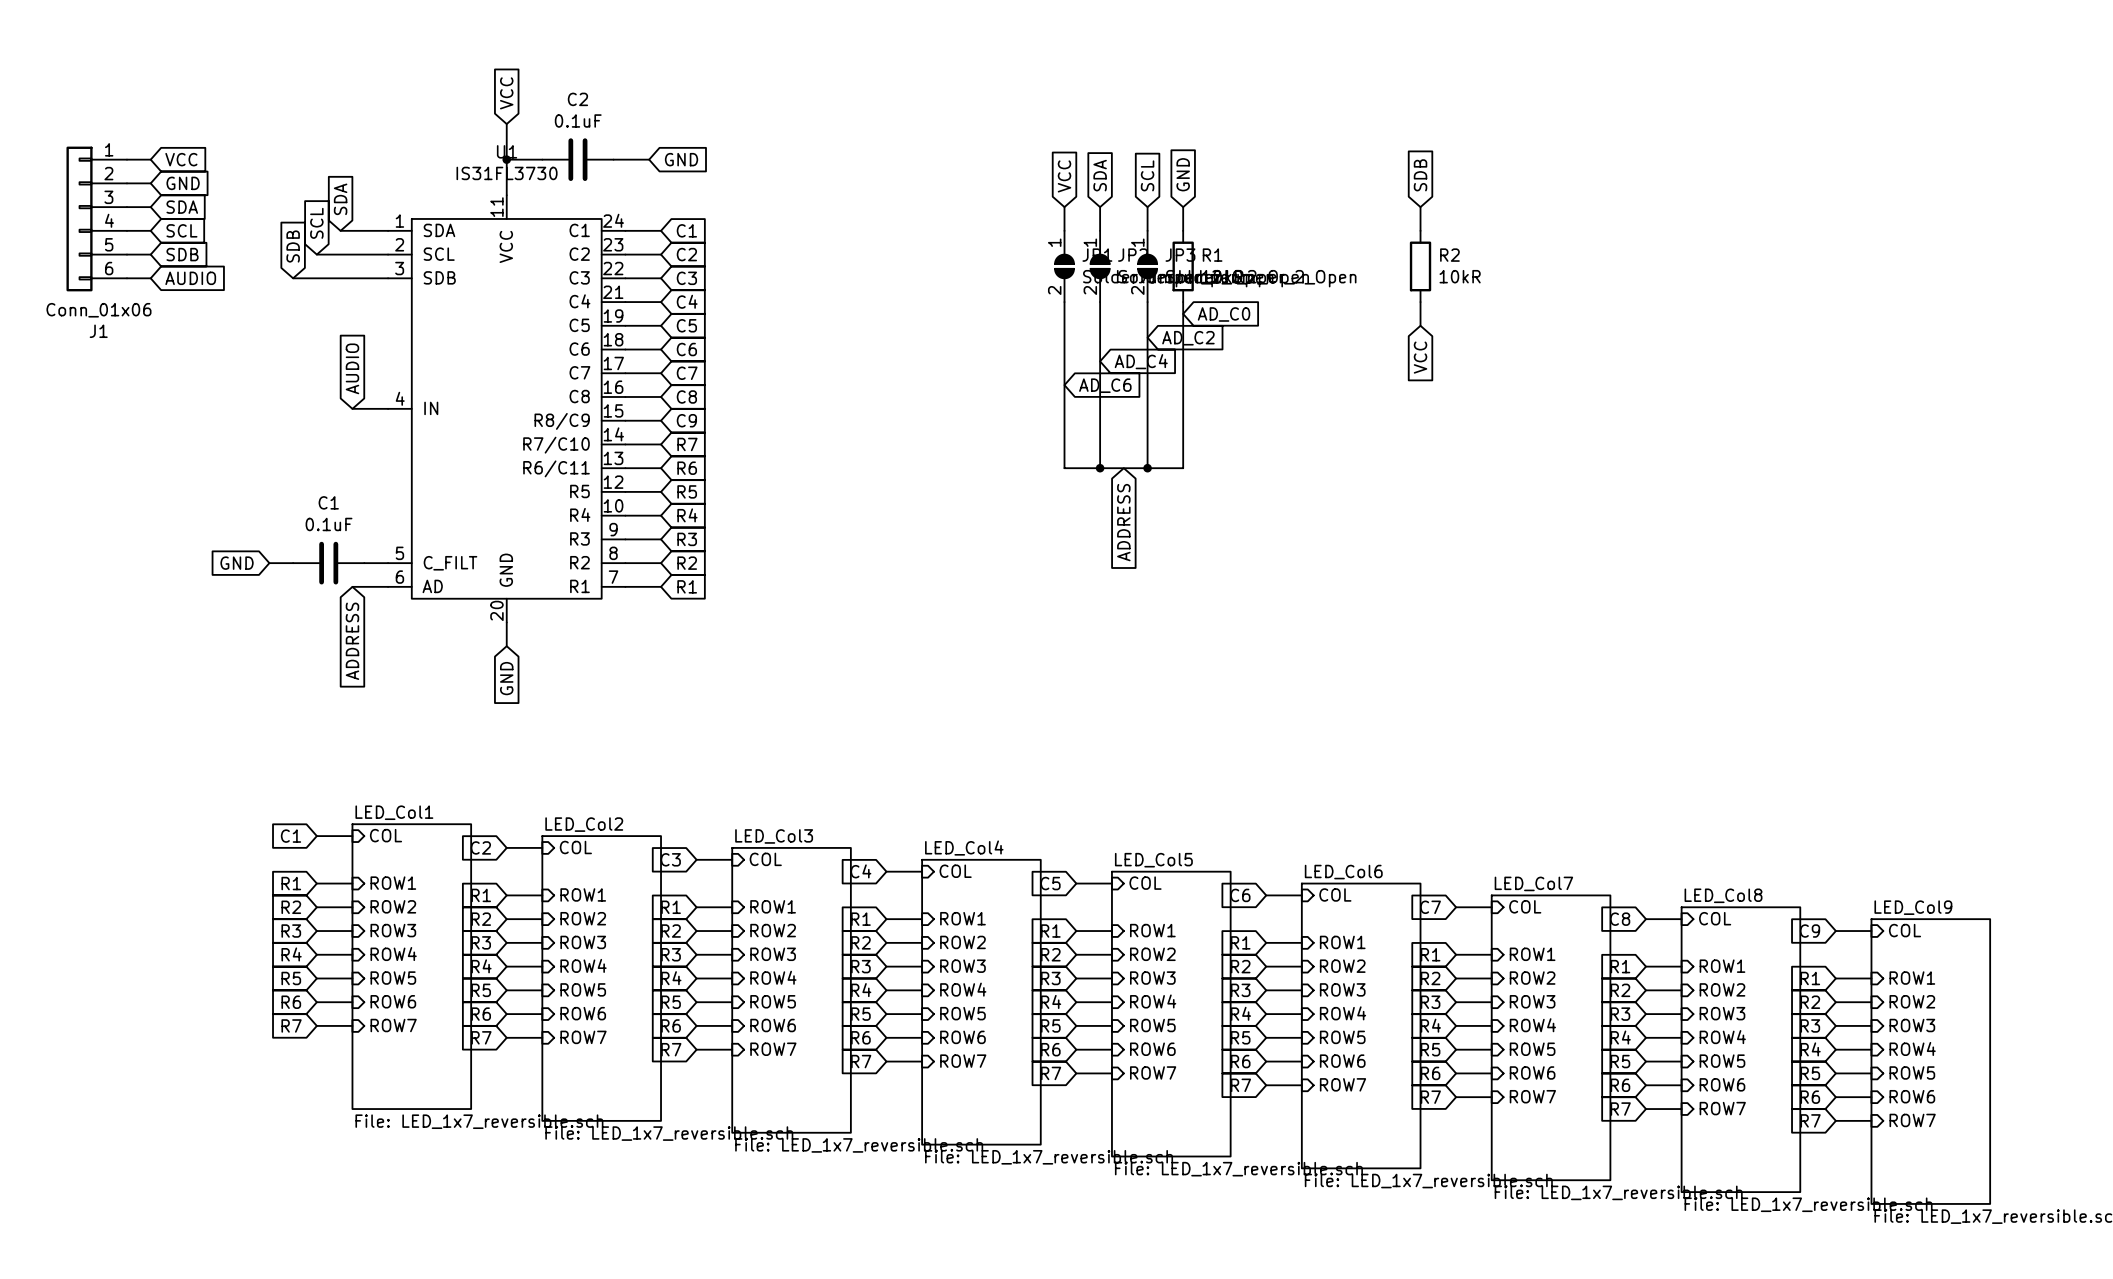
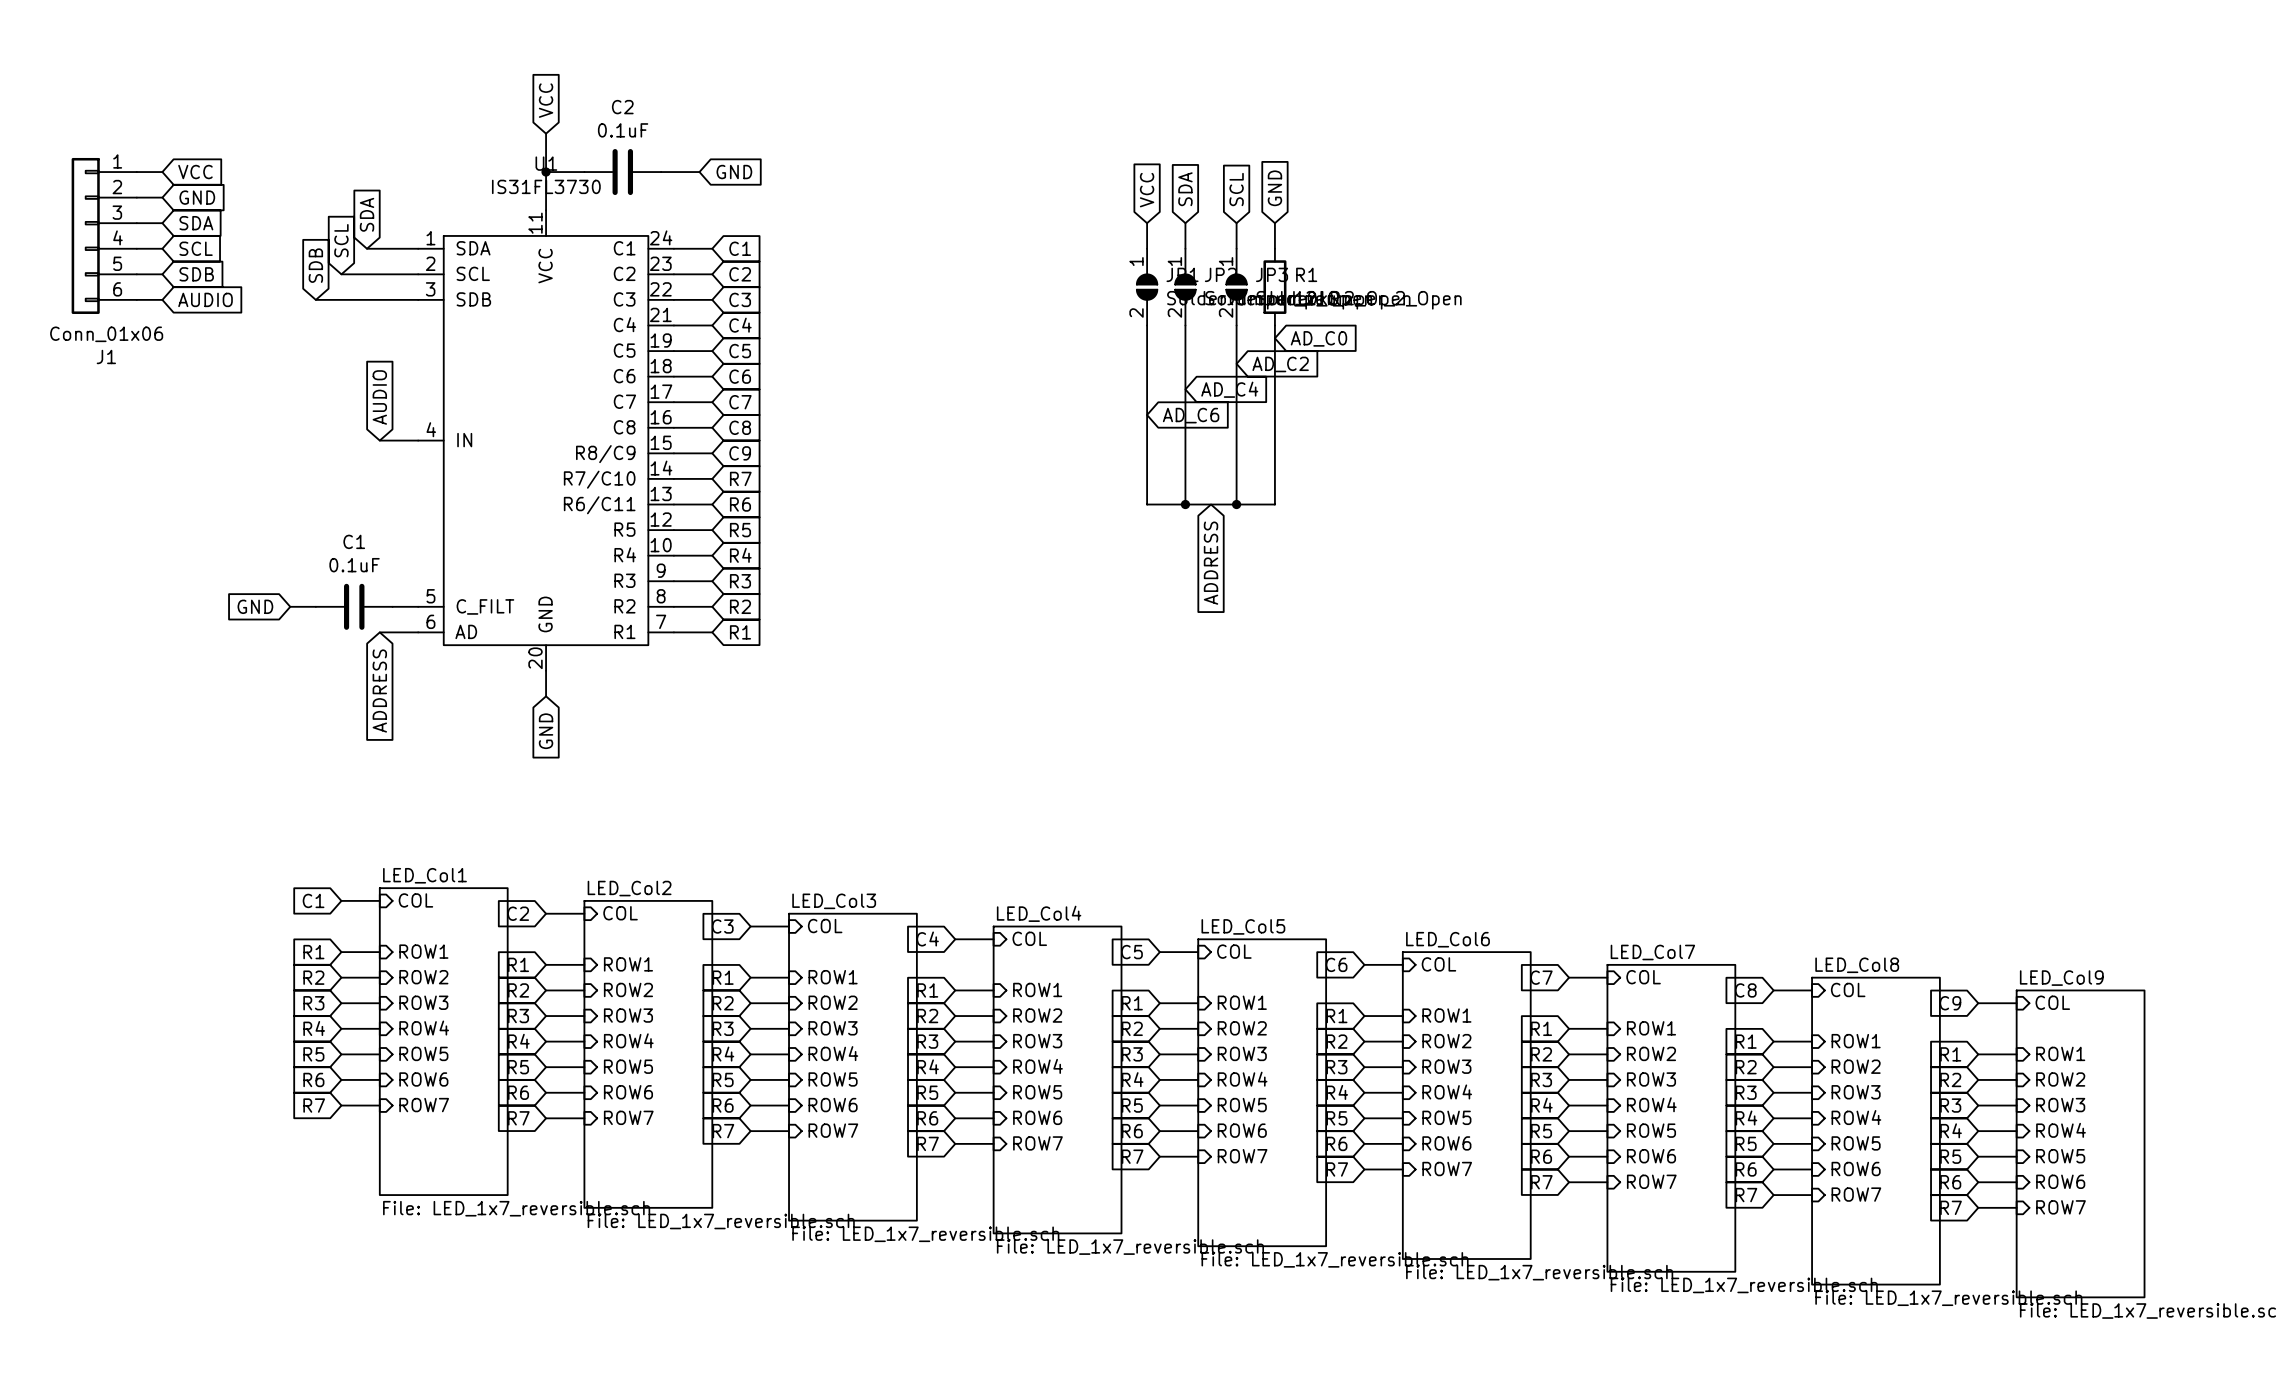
global label: SDB (1420, 175) -> none
wire: (1420, 207) (1420, 230) -> none
R2: 10kR (1420, 266) -> none
wire: (1420, 302) (1420, 325) -> none
global label: VCC (1420, 357) -> none

